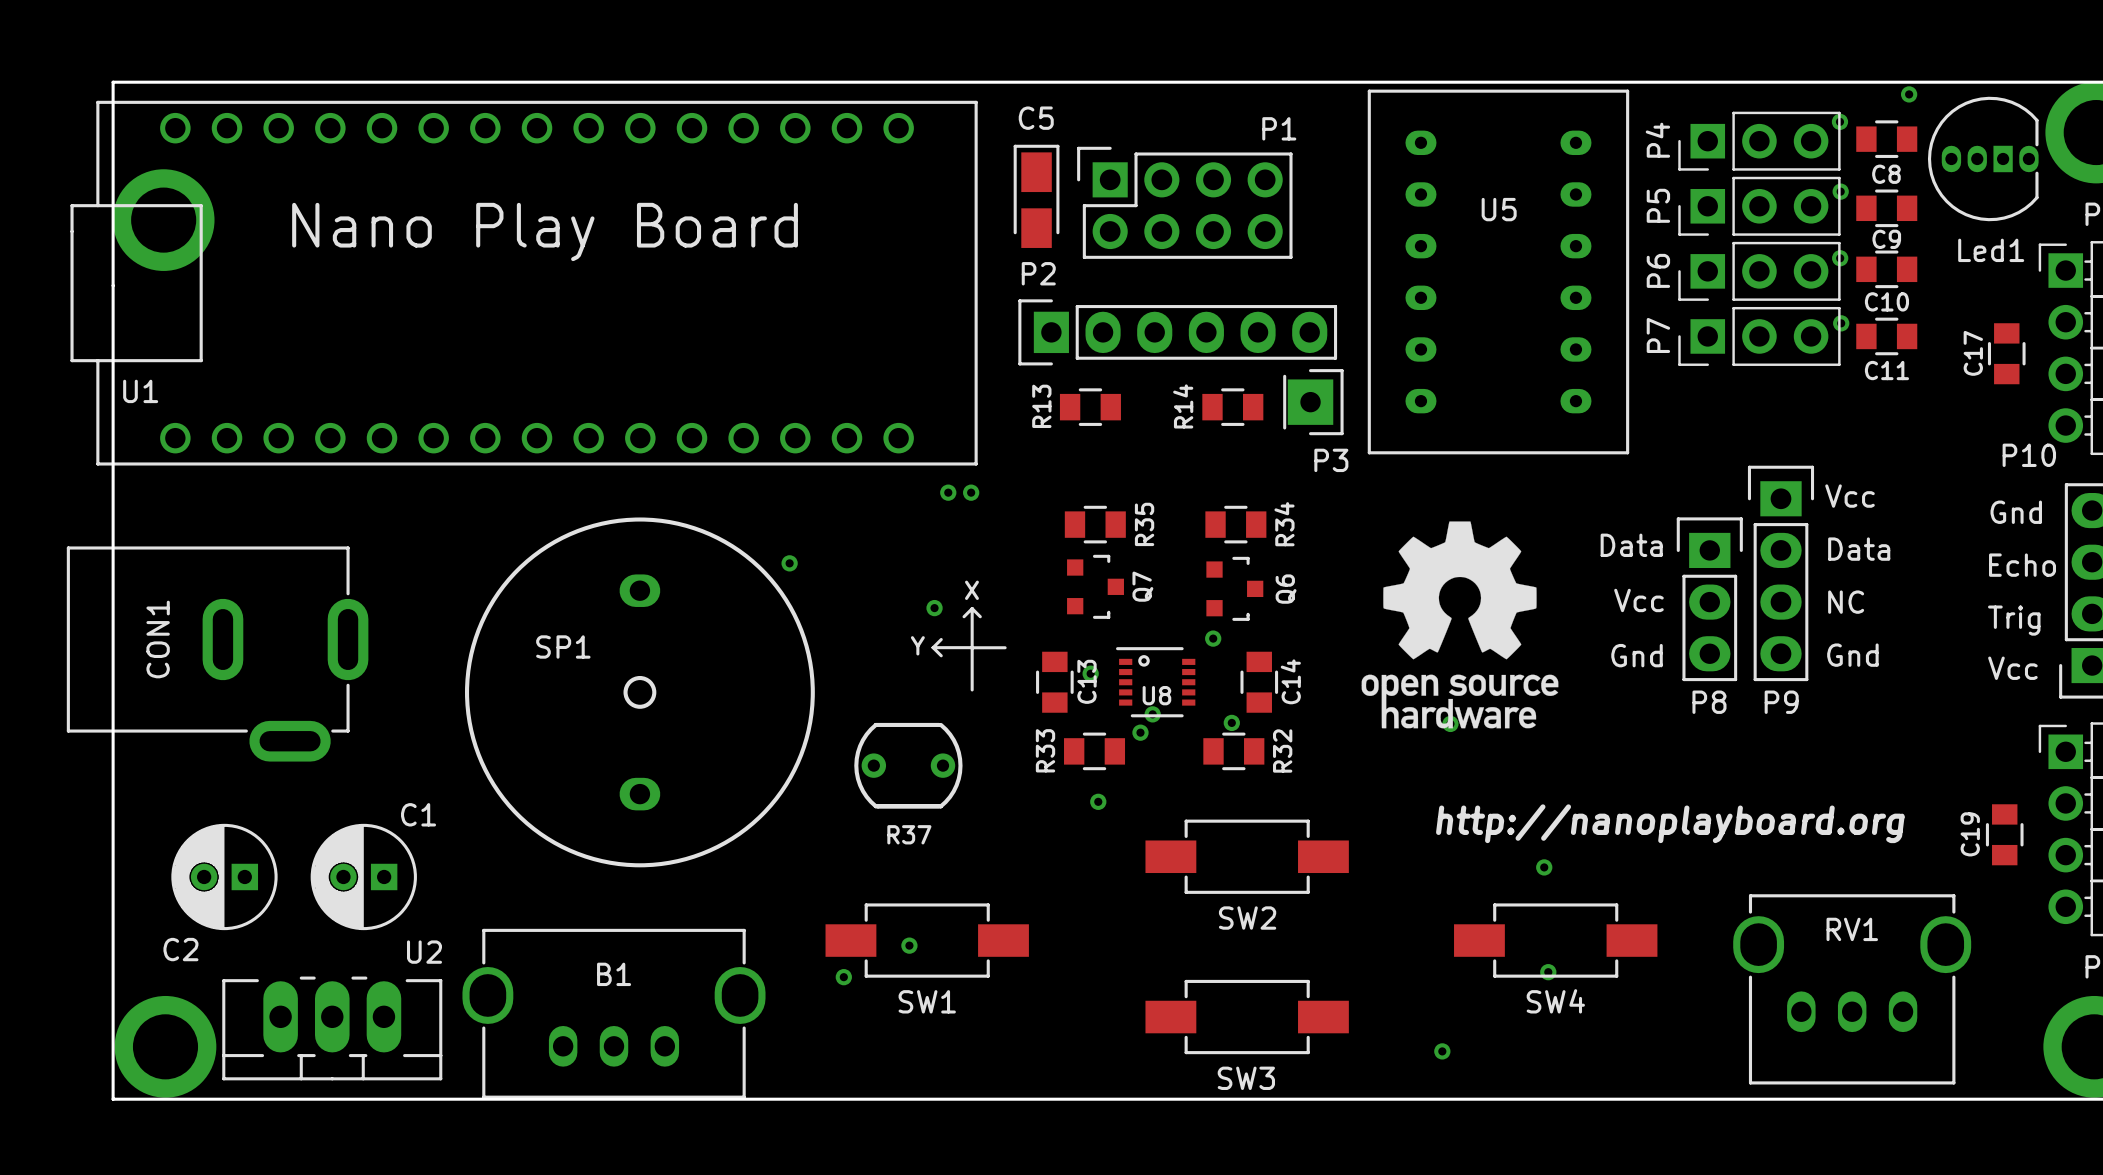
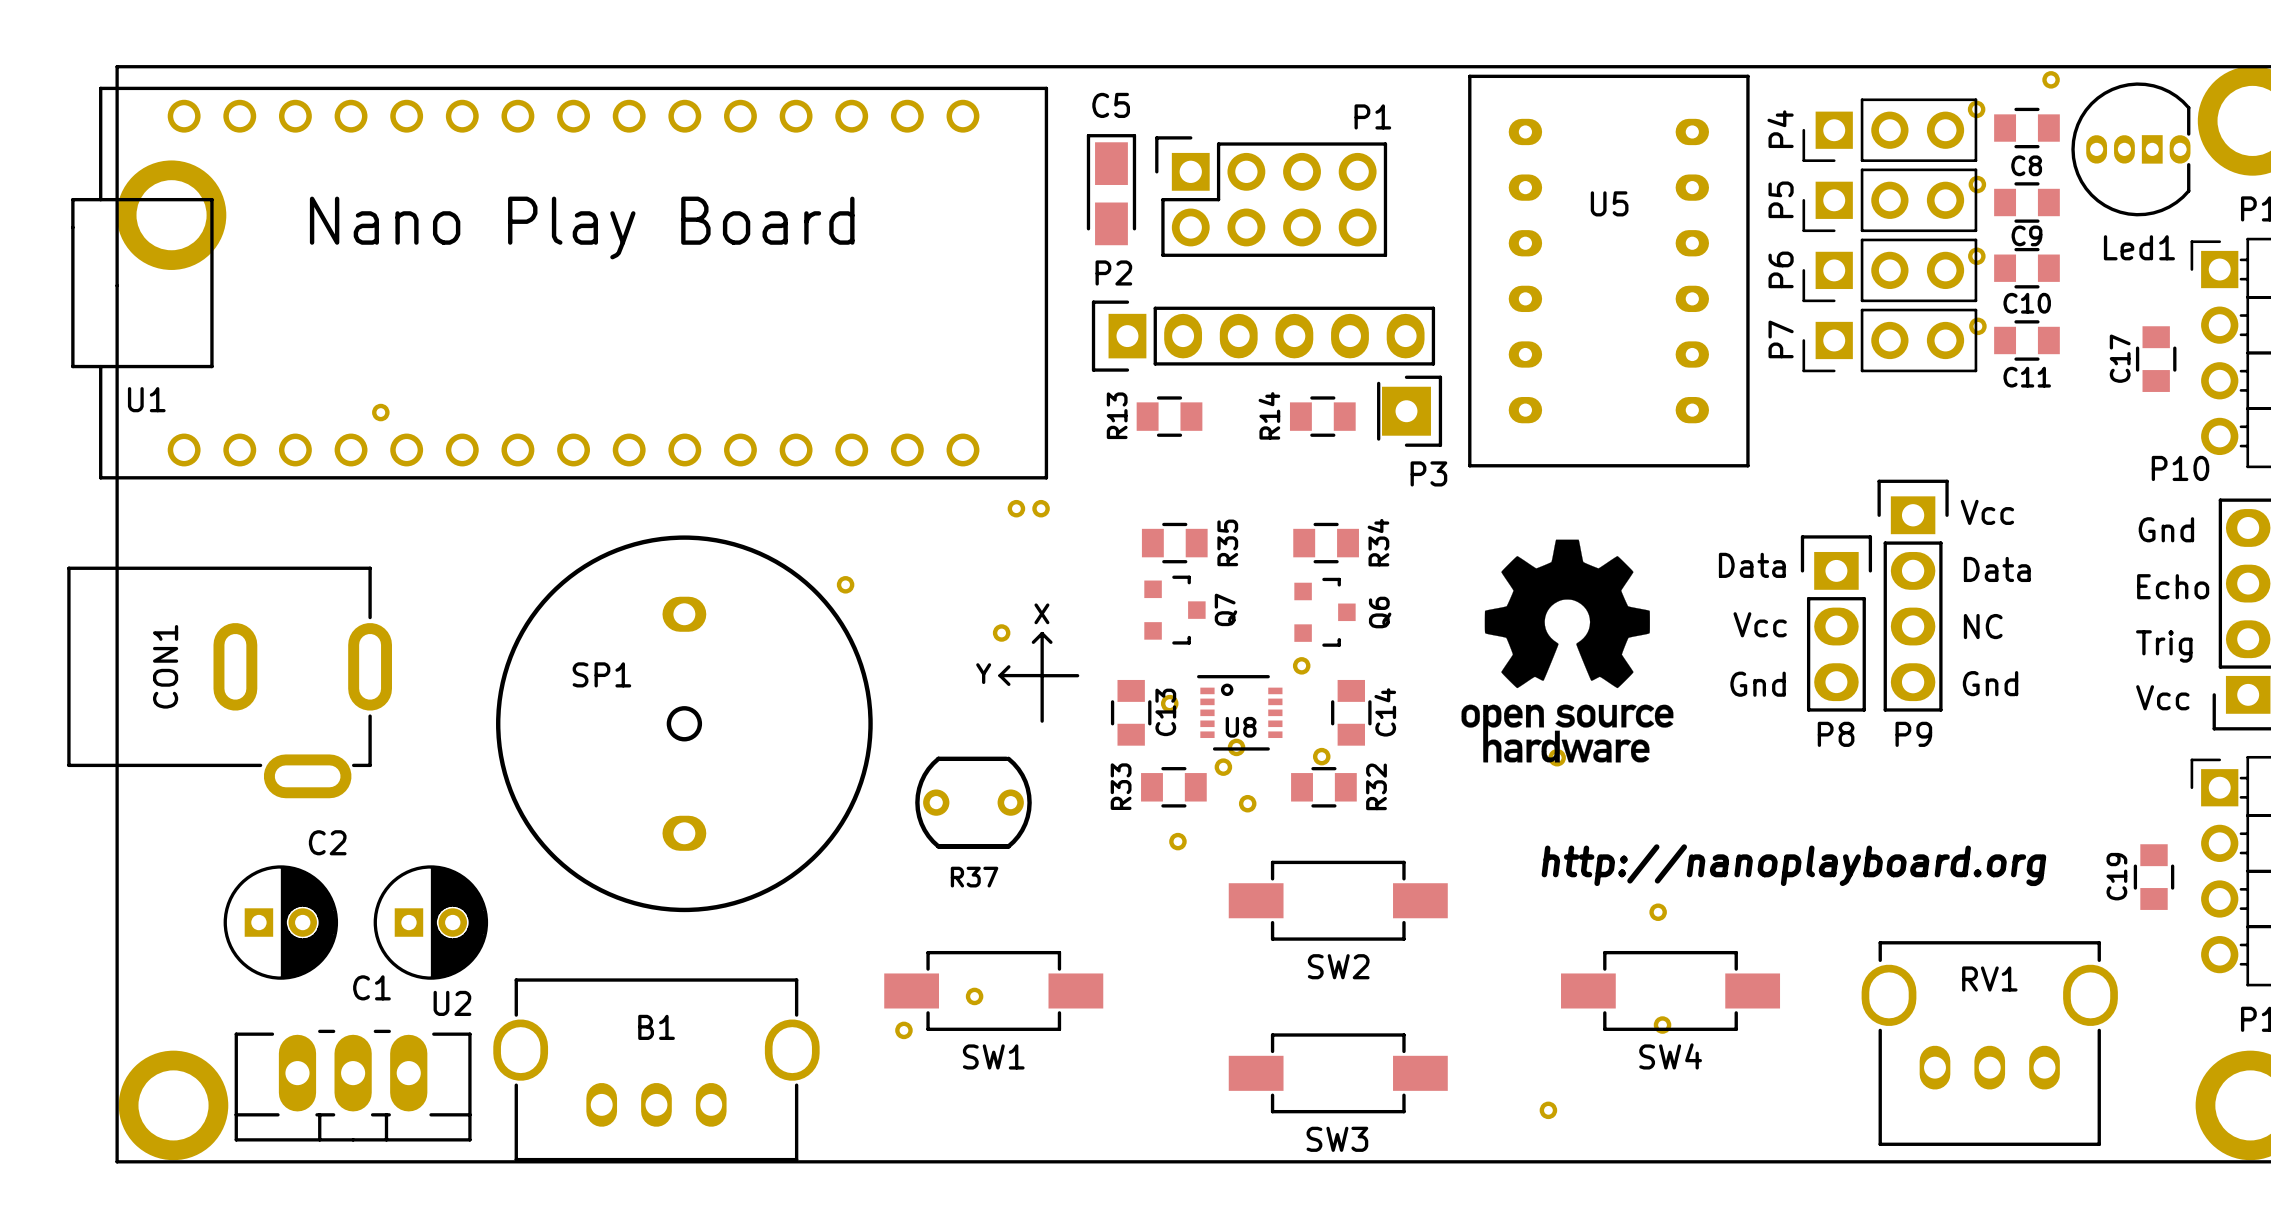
part: none -> (380, 412)
part: none -> (1247, 803)
C2 rotation: 0° (224, 876) -> 180° (280, 922)
C1 rotation: 0° (363, 876) -> 180° (430, 922)

